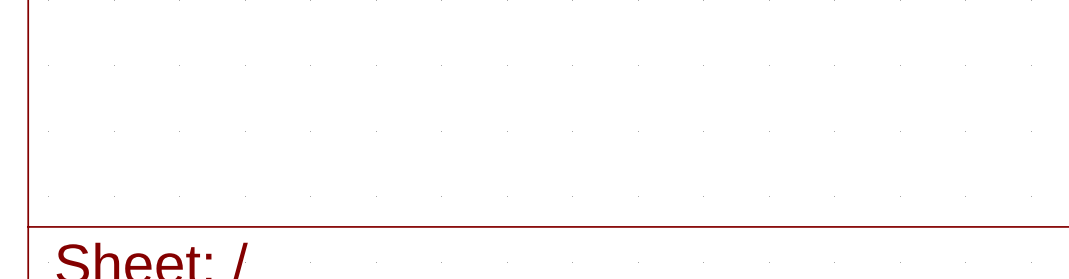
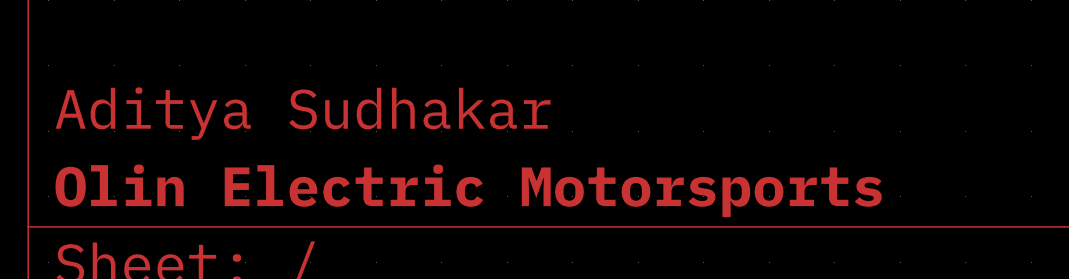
title block: none -> Aditya Sudhakar (303, 113)
title block: none -> Olin Electric Motorsports (468, 190)

